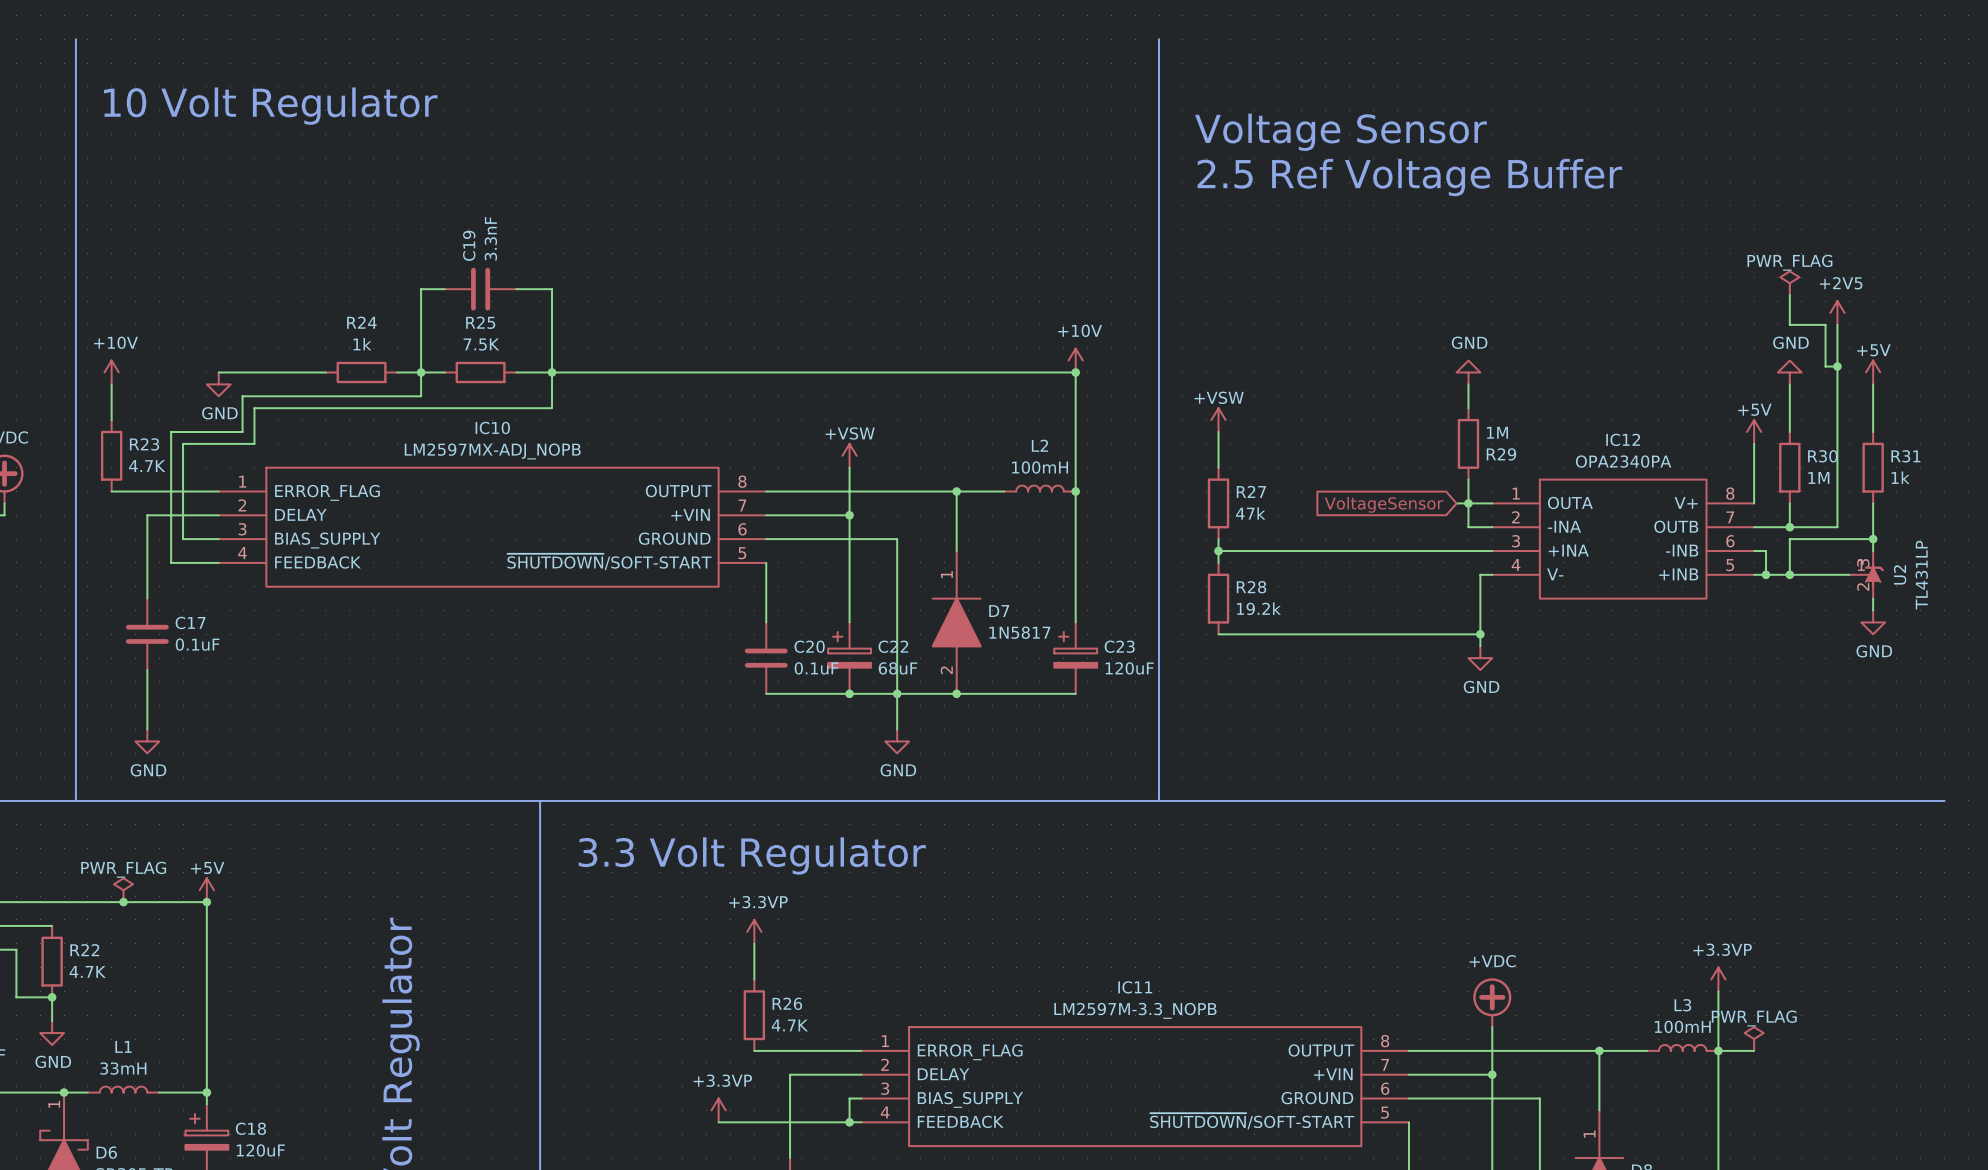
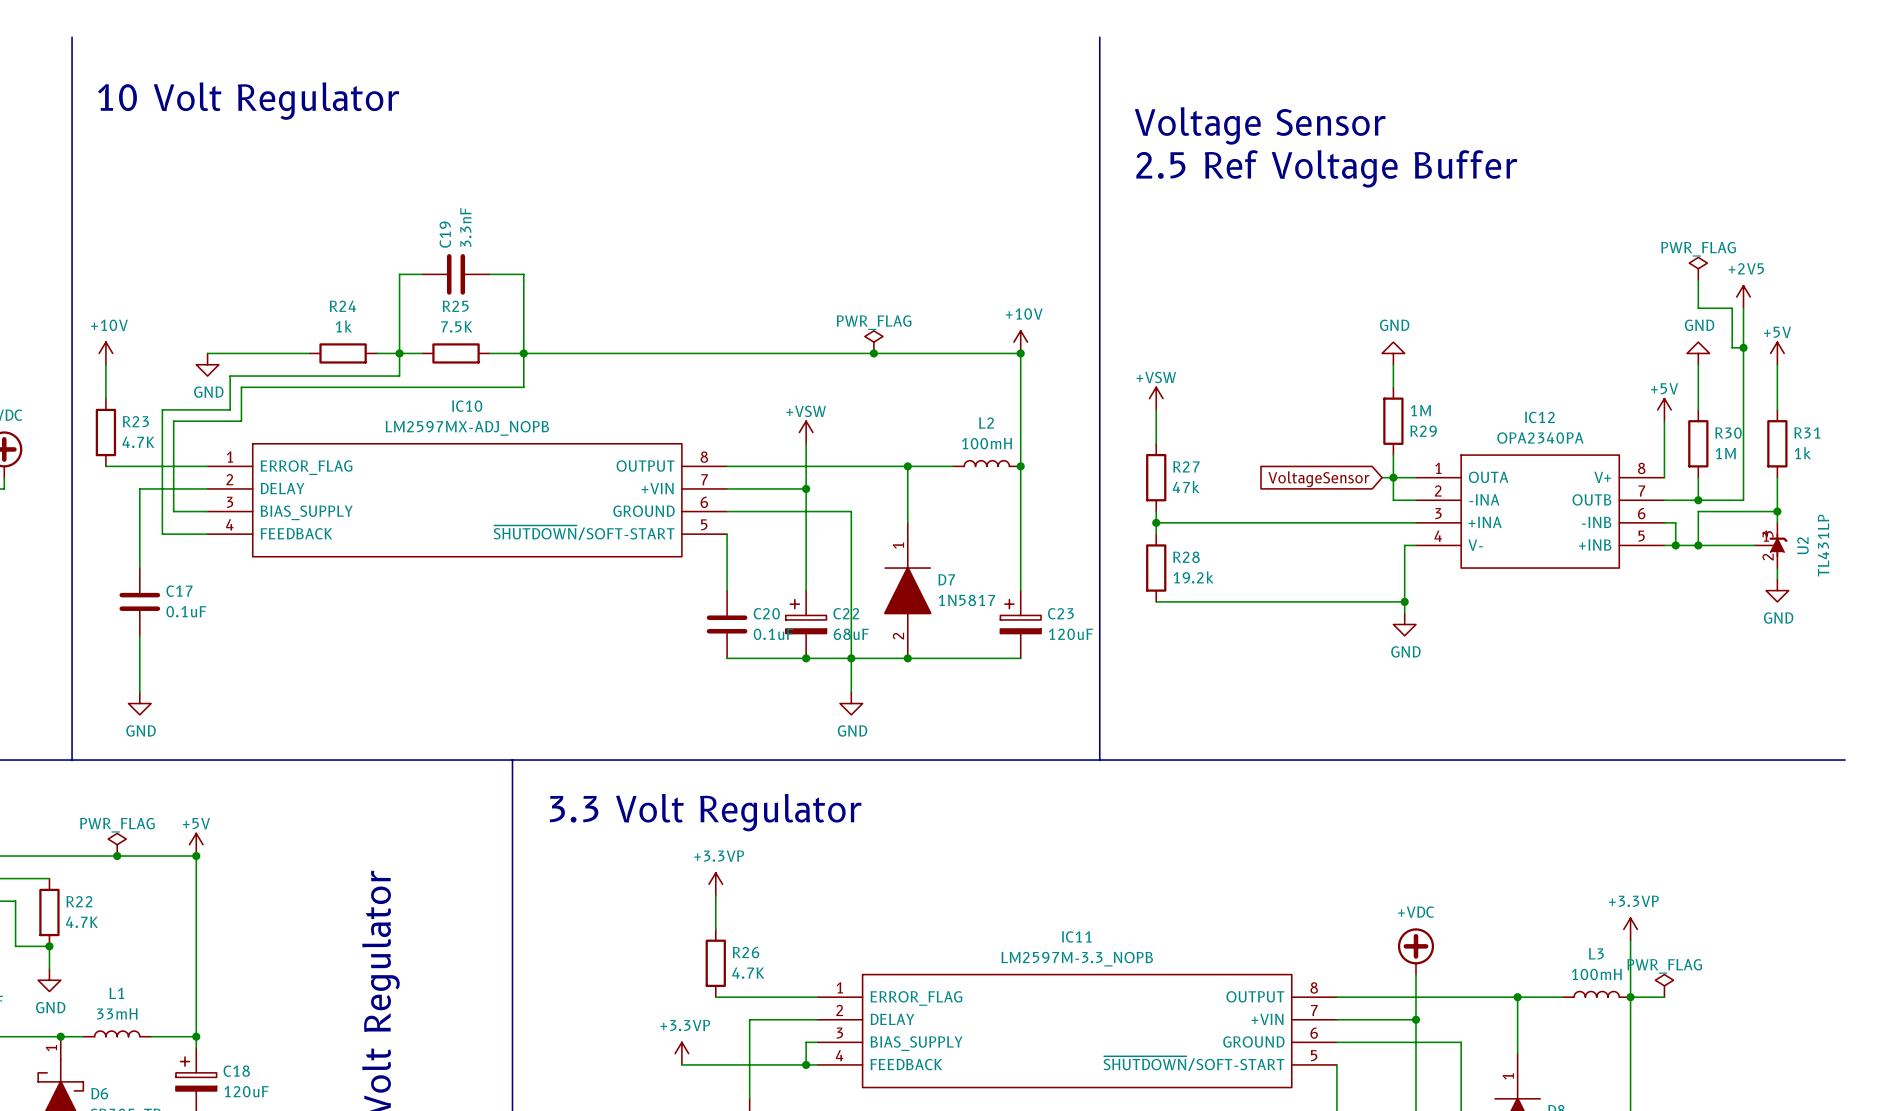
power symbol: none -> PWR_FLAG (873, 342)
junction: none -> (873, 353)

